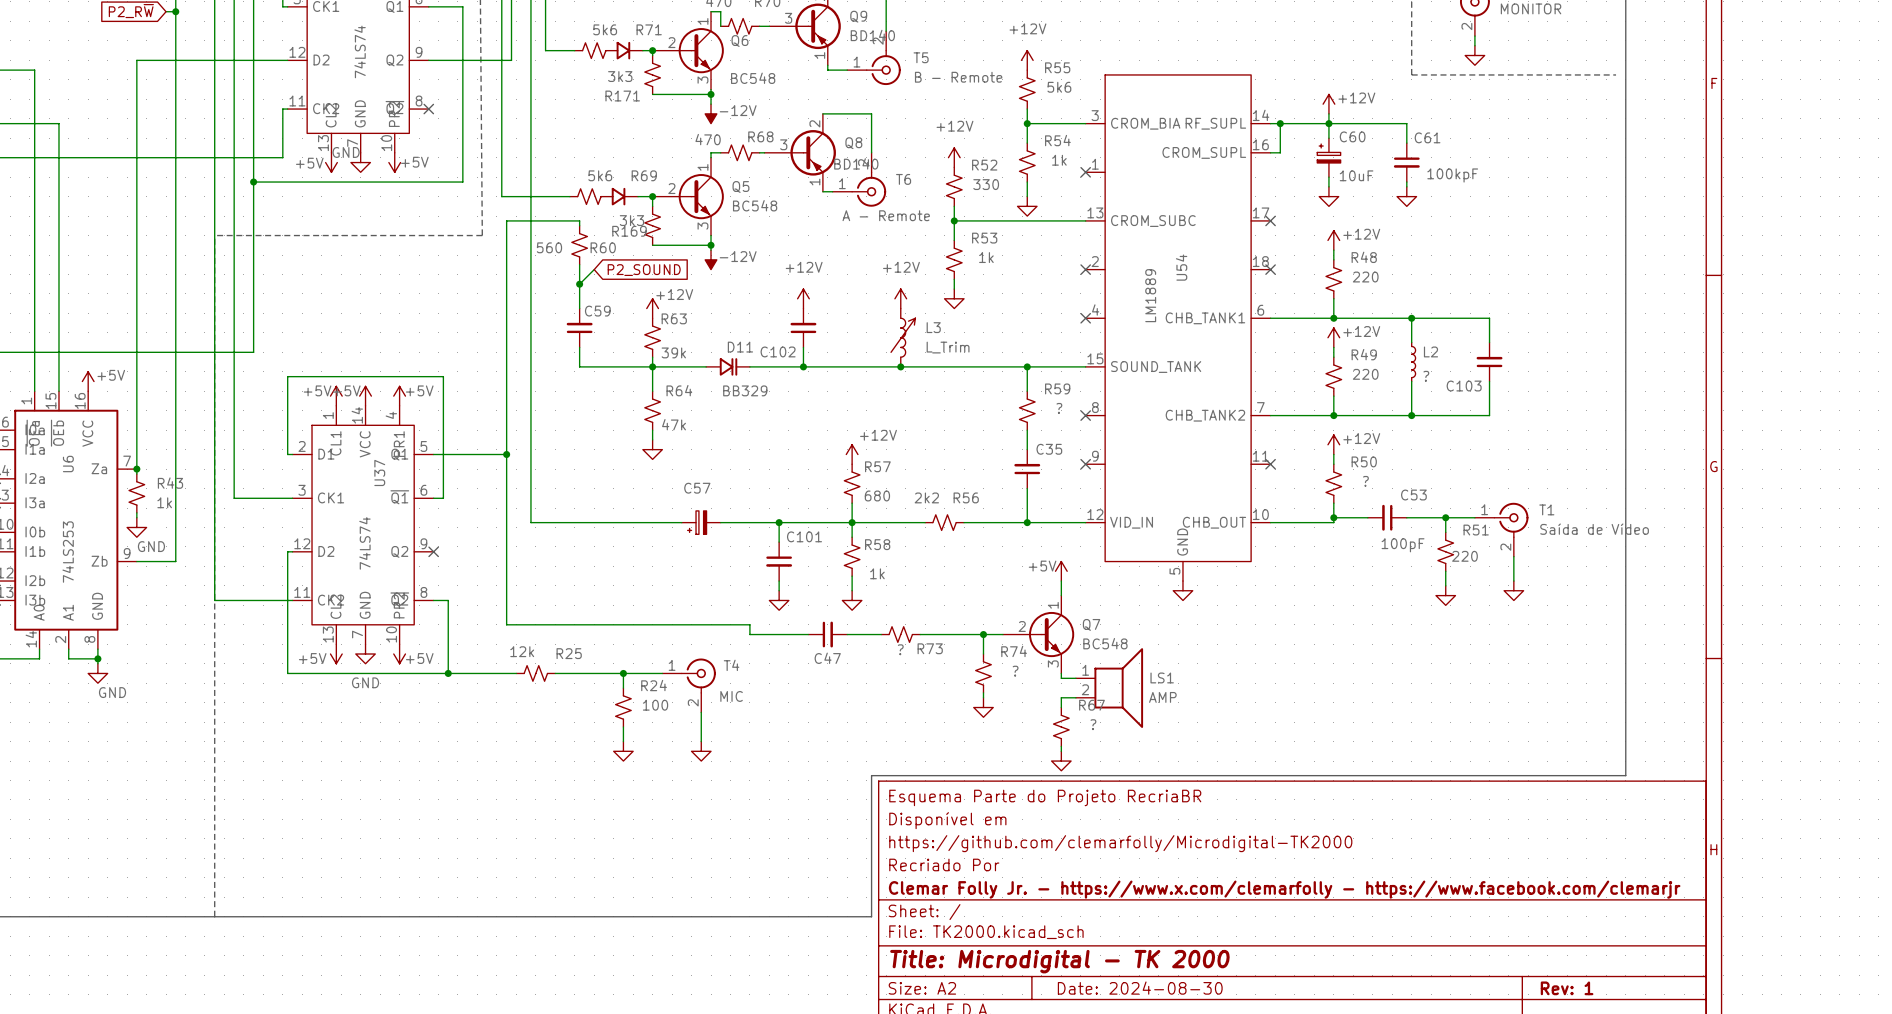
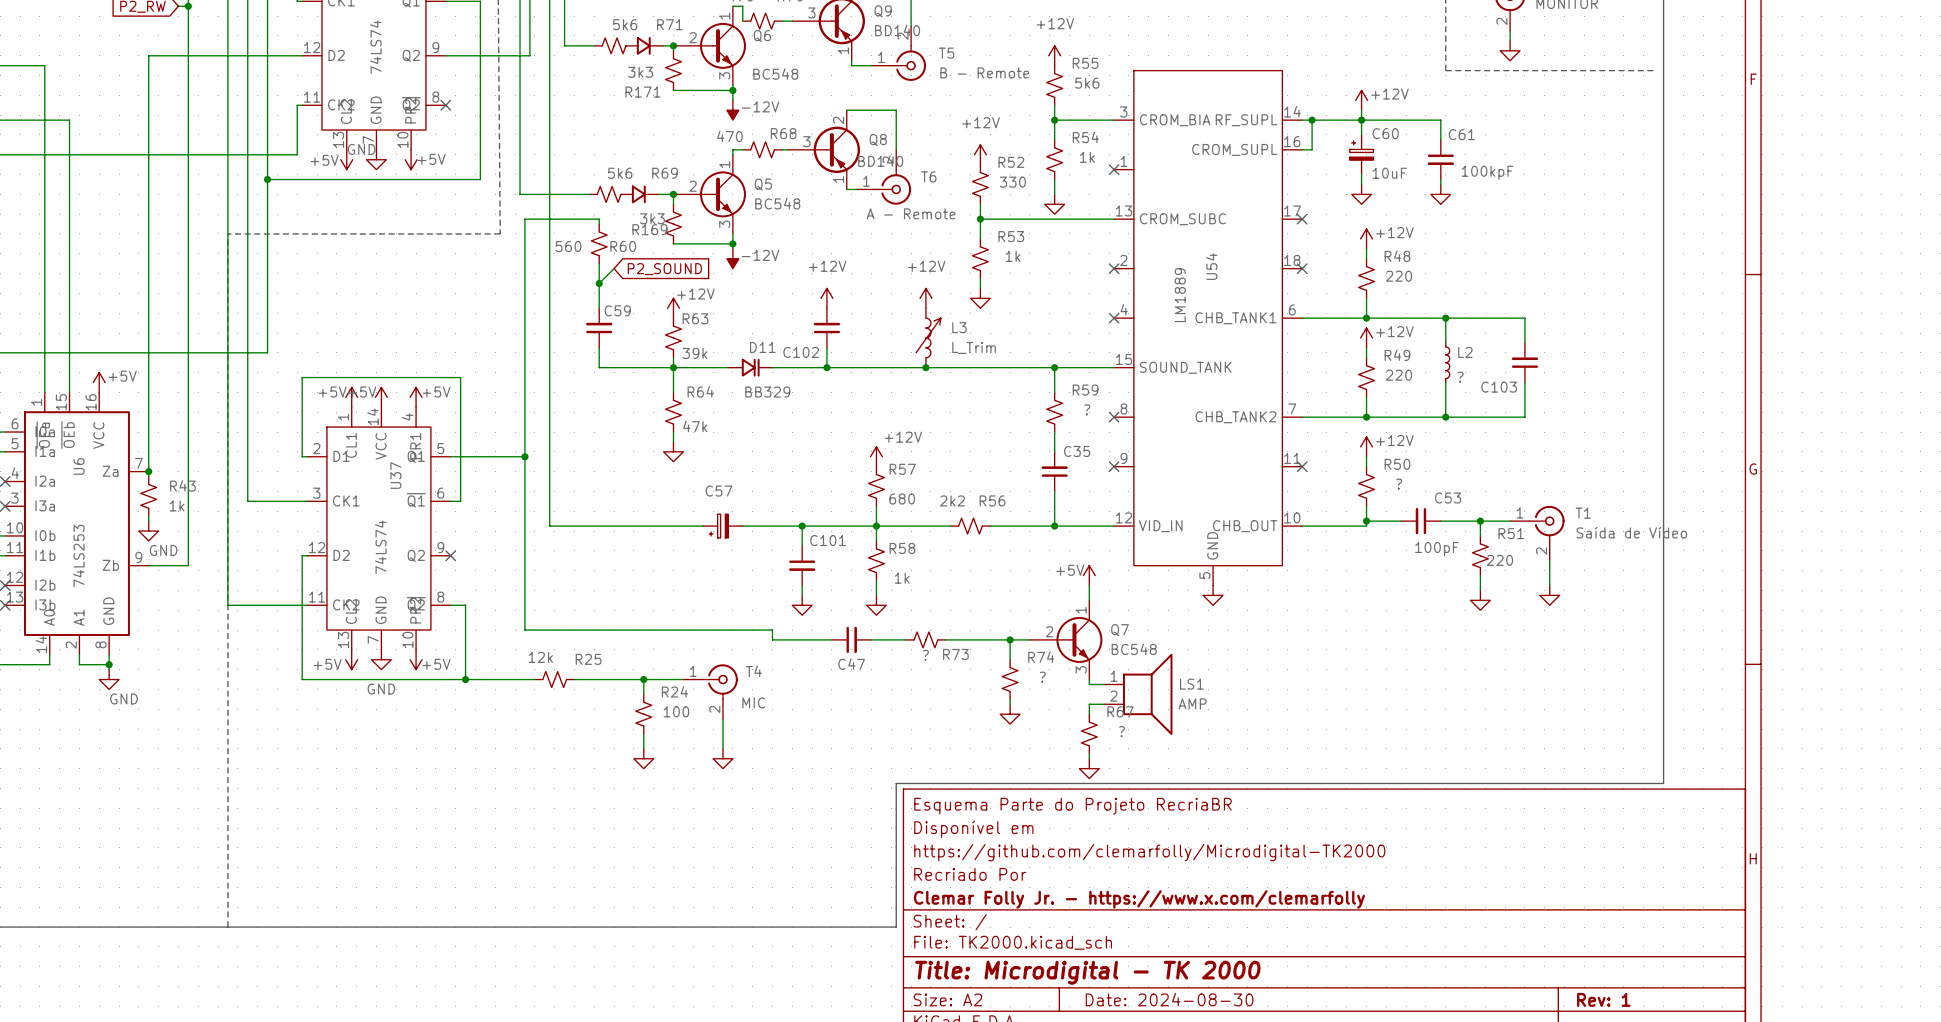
title block: Clemar Folly Jr. - https://www.x.com/clemarfolly - https://www.facebook.com/clemarjr (1284, 889) -> Clemar Folly Jr. - https://www.x.com/clemarfolly (1139, 899)

